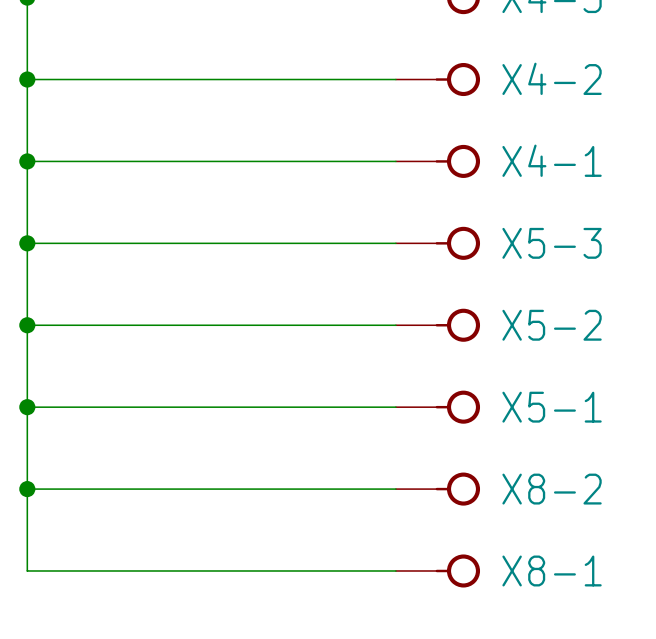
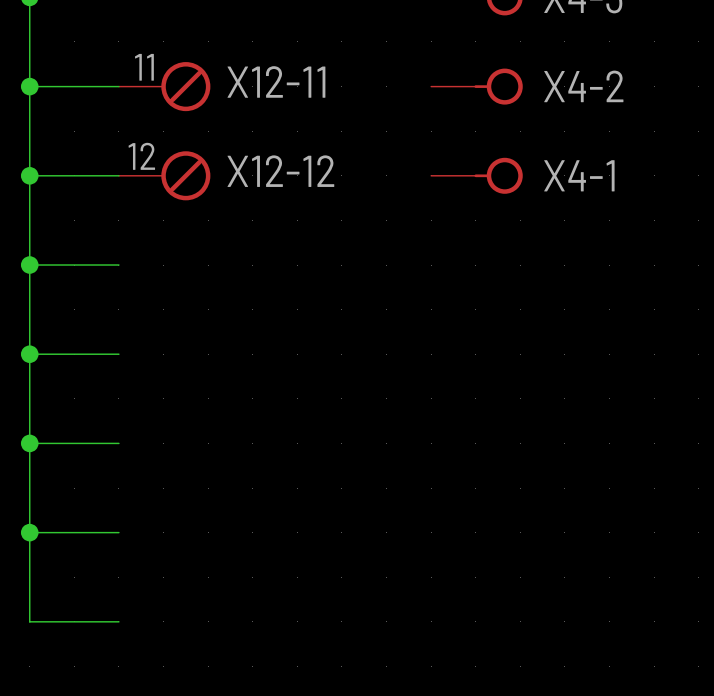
wire: (109, 79) (395, 79) -> none
X12-11: none -> (164, 86)
wire: (109, 161) (395, 161) -> none
X12-12: none -> (164, 175)
wire: (109, 243) (395, 243) -> none
X5-3: (437, 243) -> none
wire: (109, 325) (395, 325) -> none
X5-2: (437, 325) -> none
wire: (109, 407) (395, 407) -> none
X5-1: (437, 407) -> none
wire: (109, 489) (395, 489) -> none
X8-2: (437, 489) -> none
wire: (109, 570) (395, 570) -> none
X8-1: (437, 570) -> none

